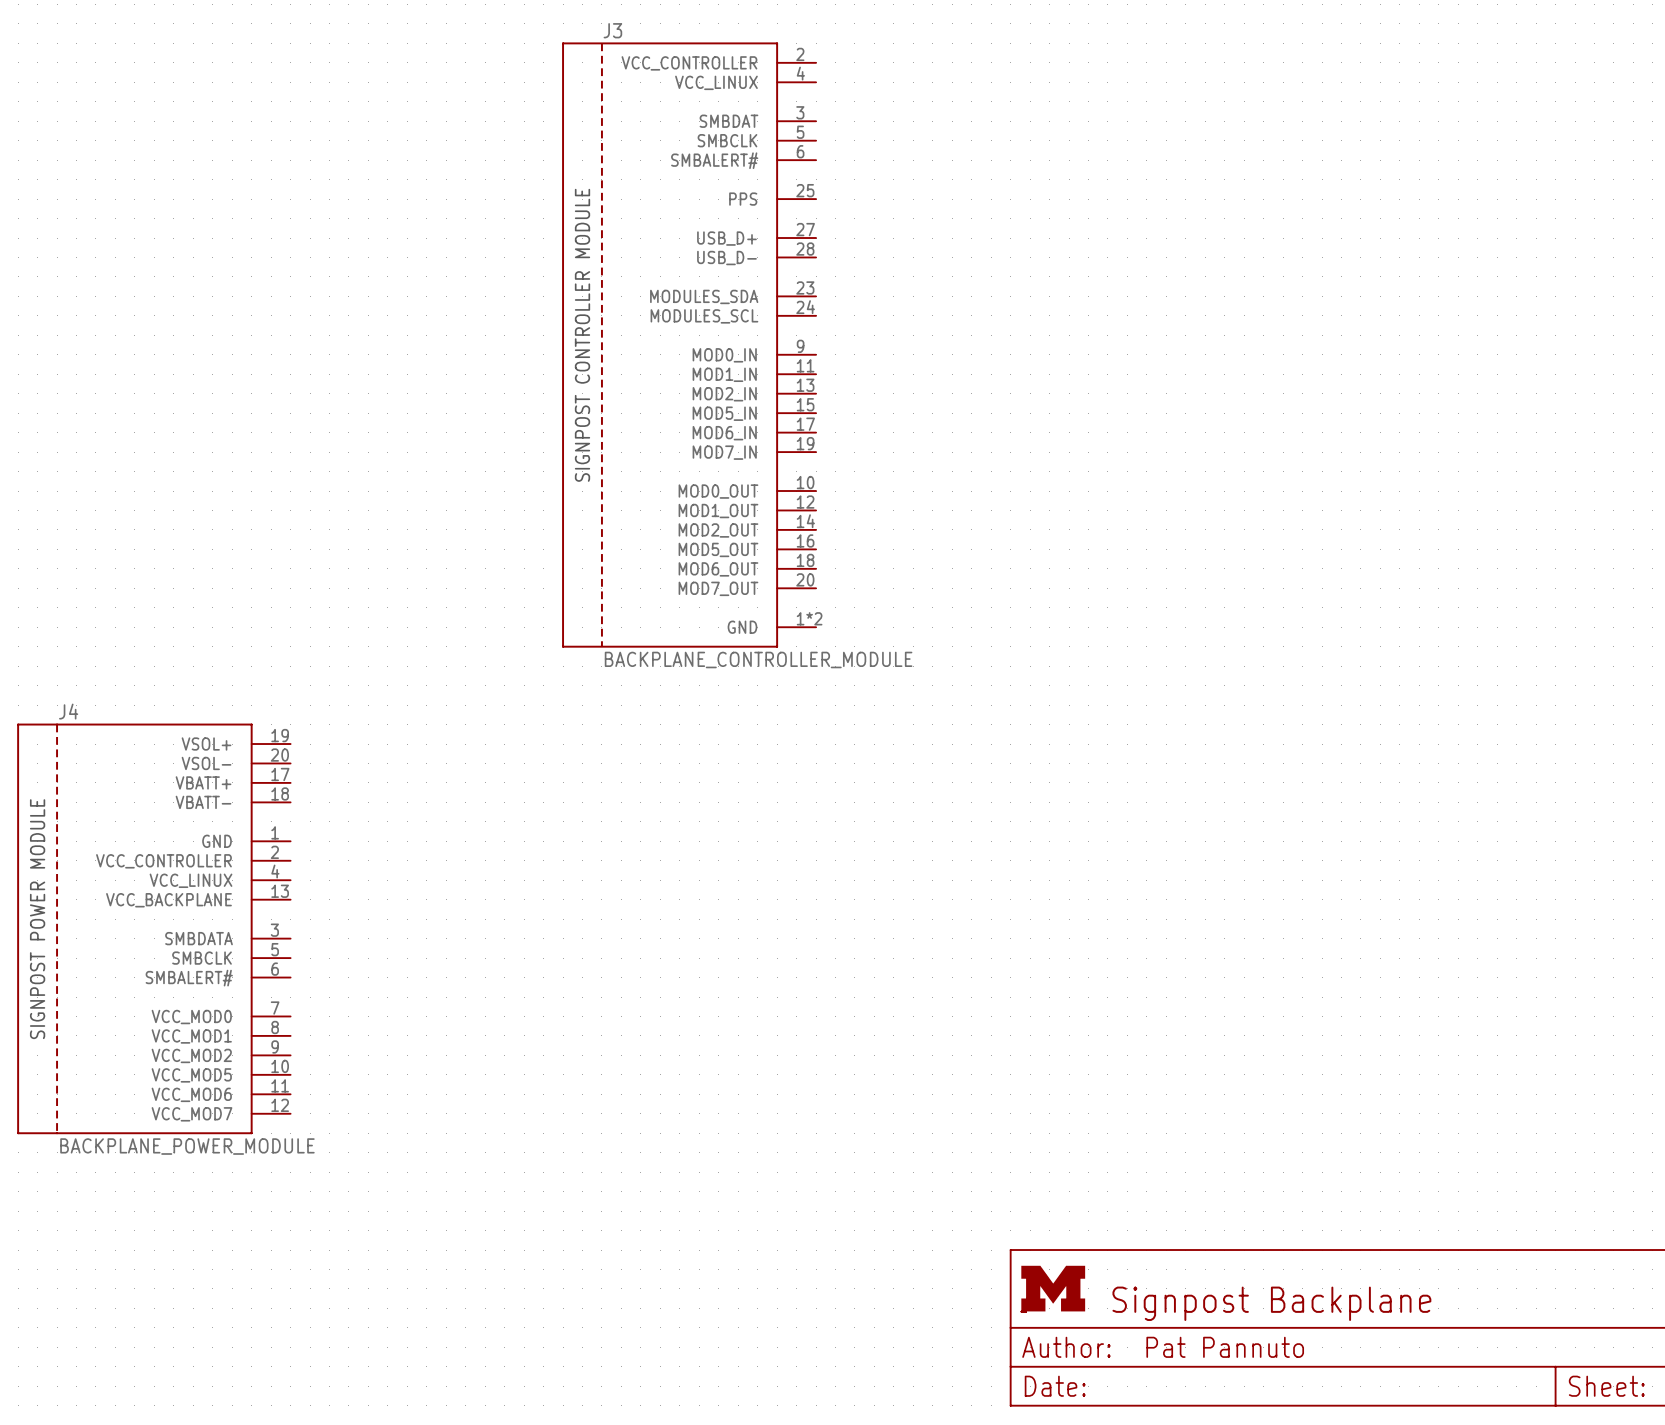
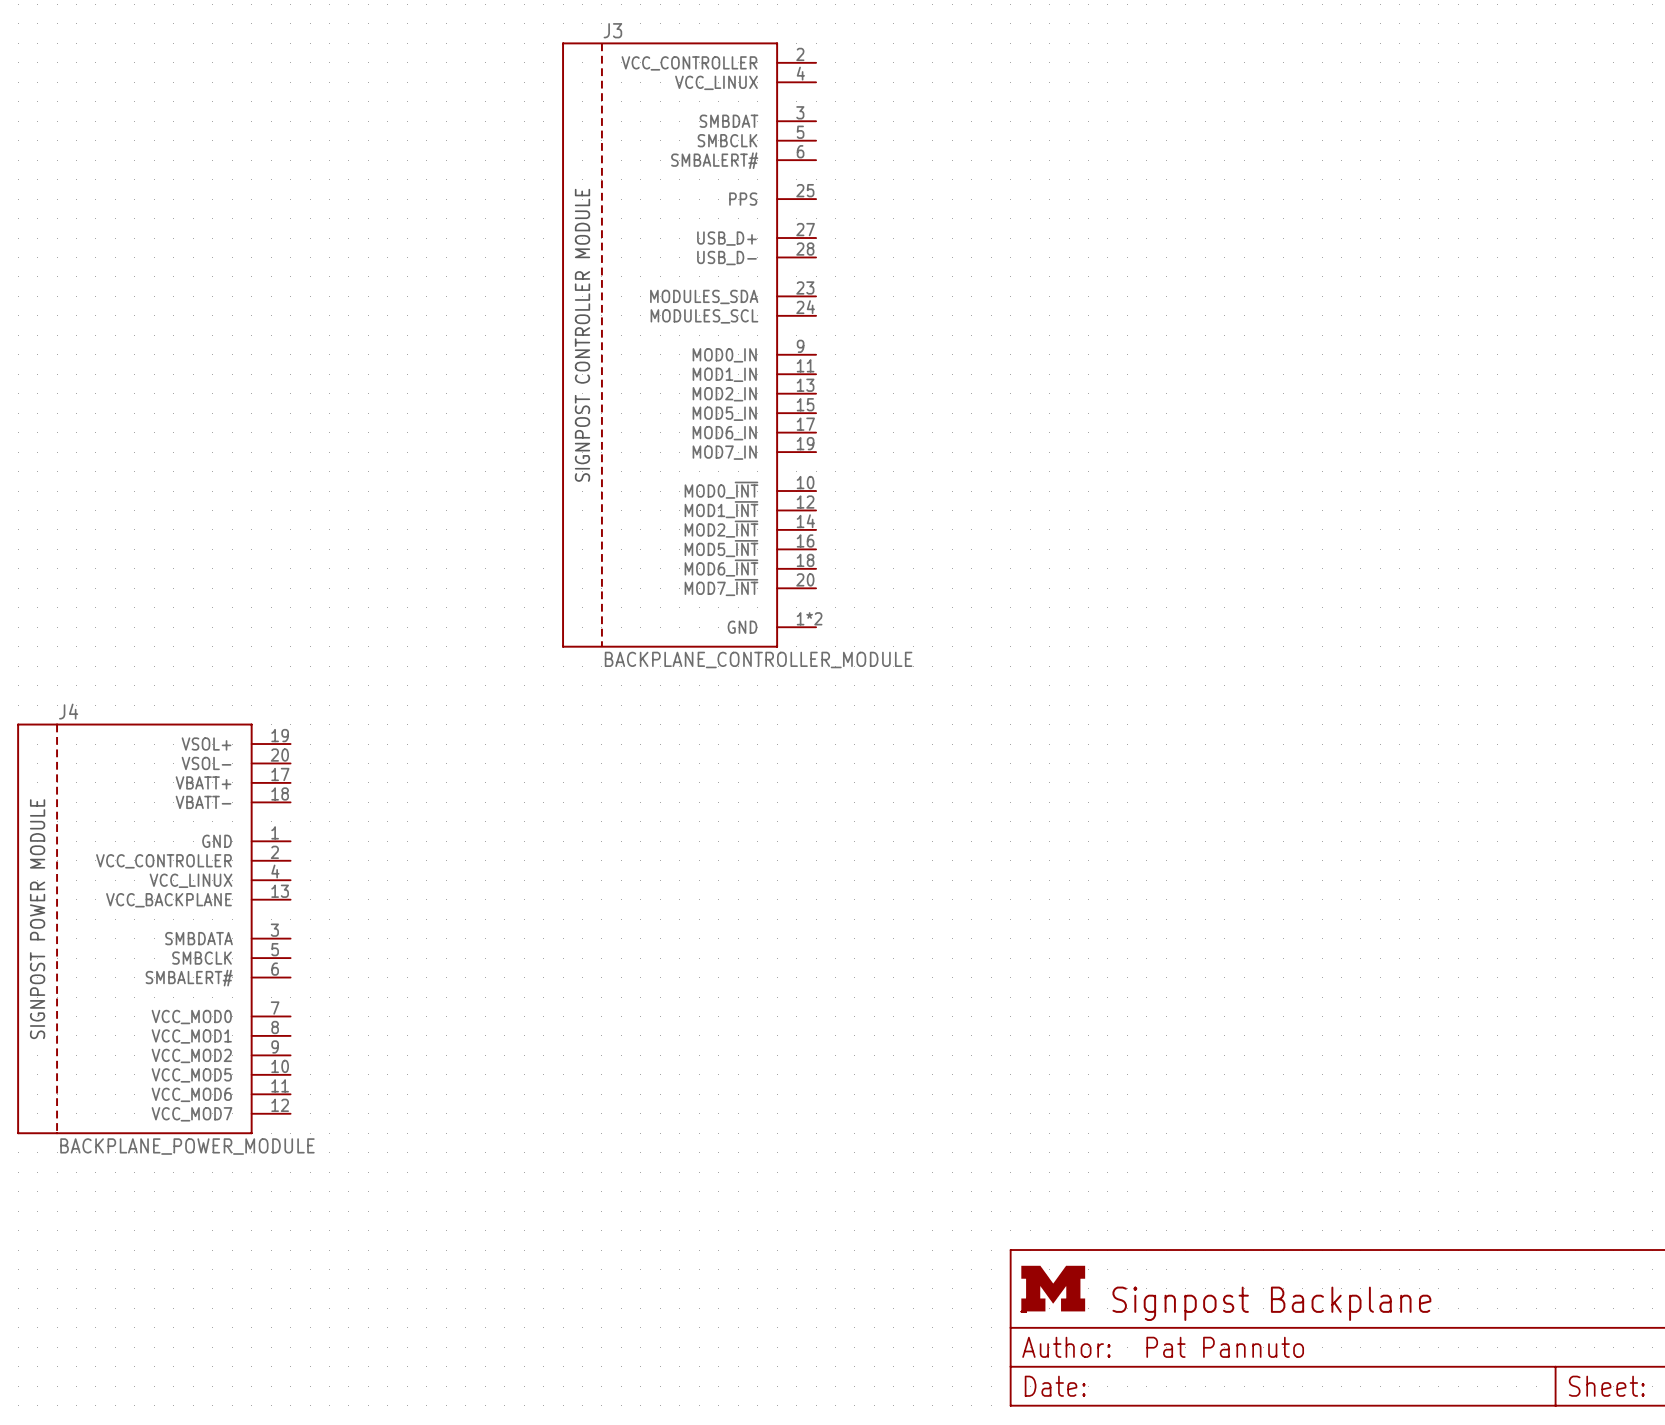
J3 pin name: MOD0_OUT (718, 491) -> MOD0_~{INT} (721, 490)
J3 pin name: MOD1_OUT (718, 511) -> MOD1_~{INT} (721, 509)
J3 pin name: MOD2_OUT (718, 530) -> MOD2_~{INT} (721, 529)
J3 pin name: MOD5_OUT (718, 549) -> MOD5_~{INT} (721, 548)
J3 pin name: MOD6_OUT (718, 569) -> MOD6_~{INT} (721, 568)
J3 pin name: MOD7_OUT (718, 588) -> MOD7_~{INT} (721, 587)

